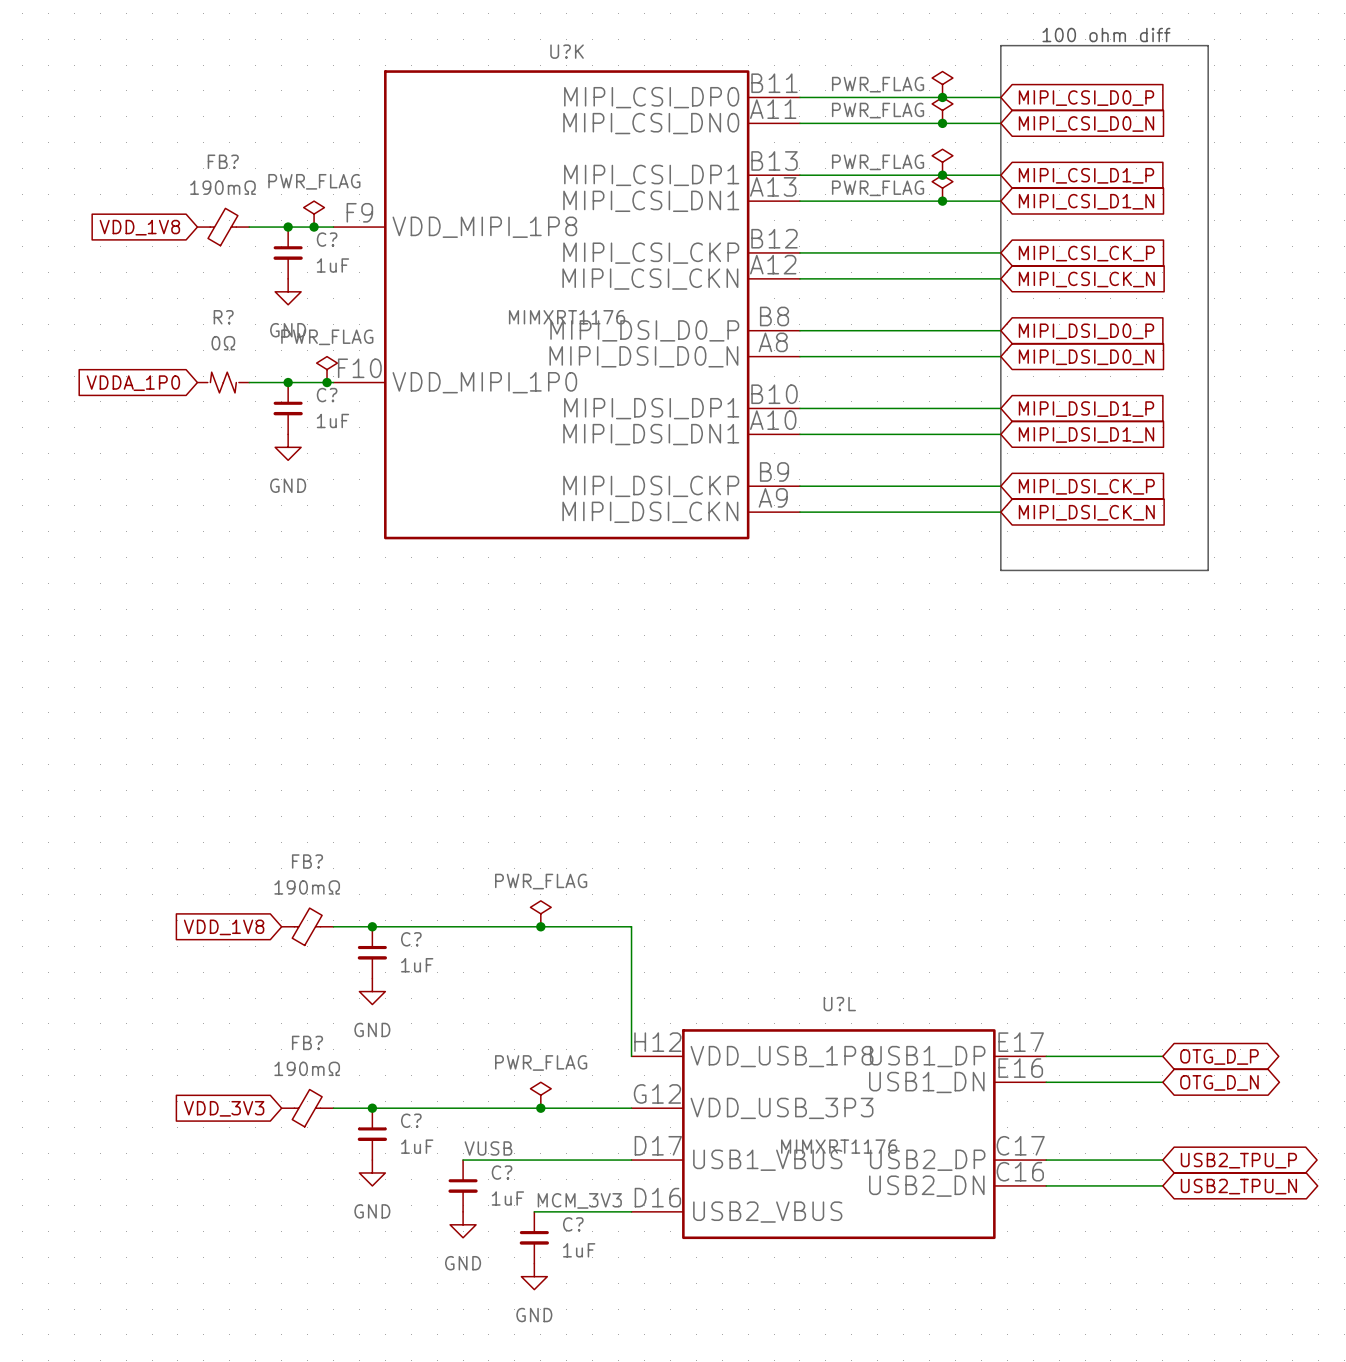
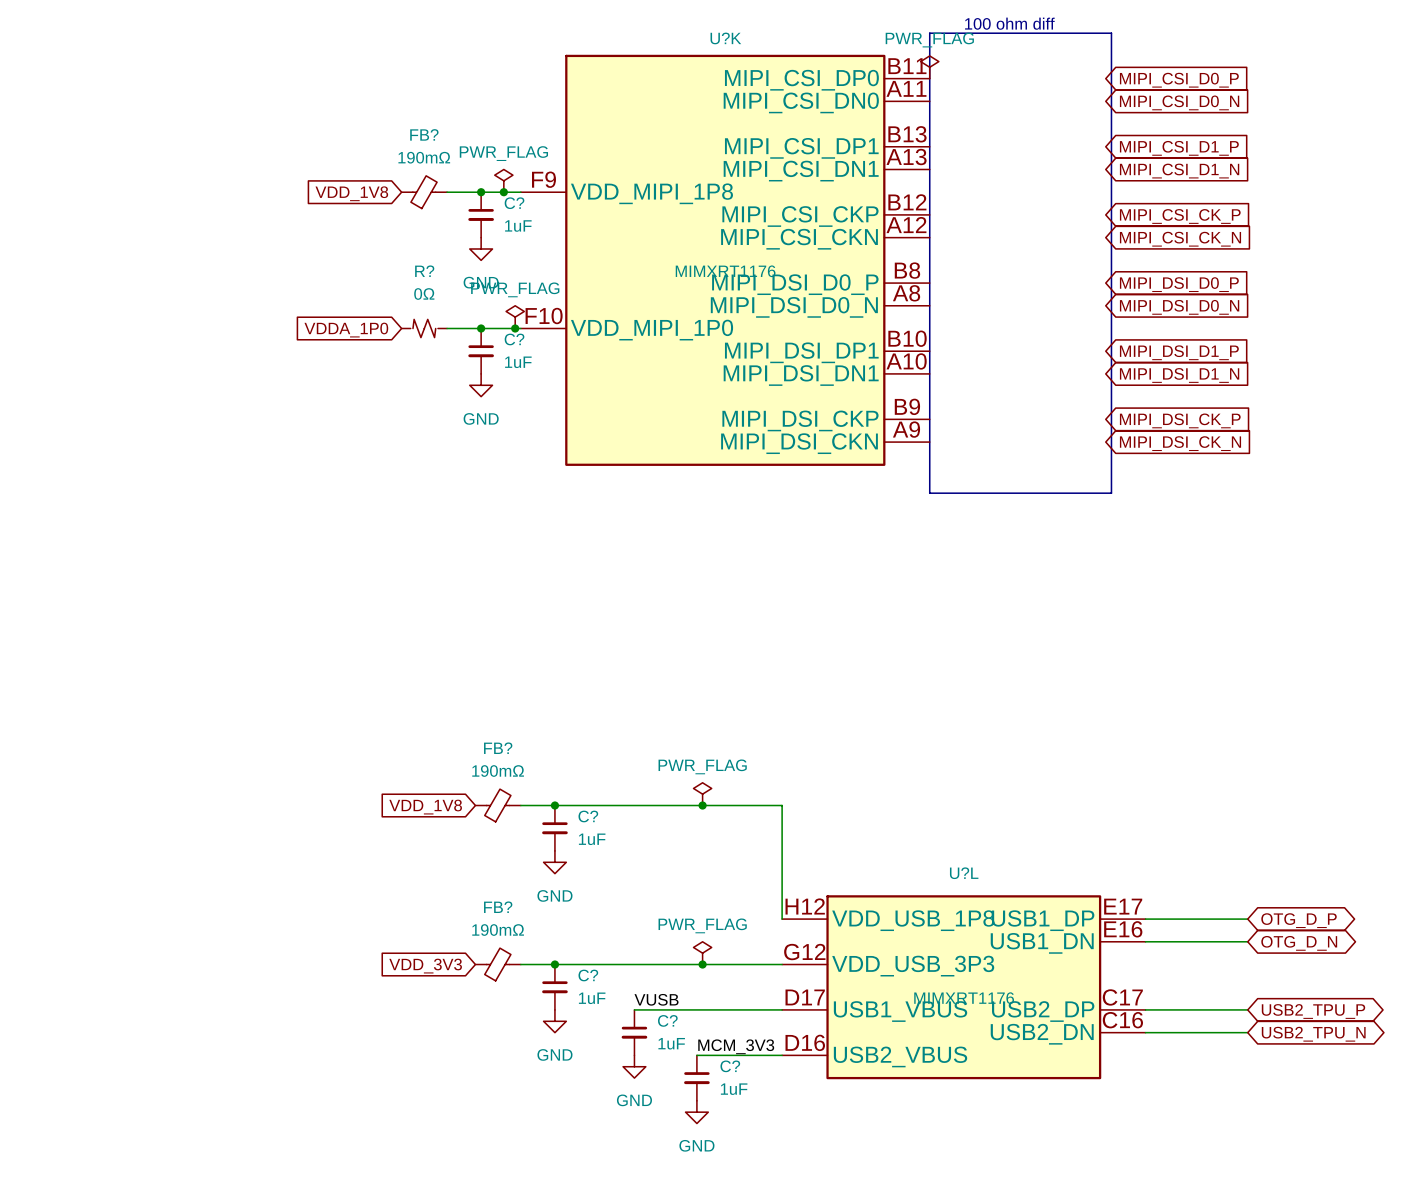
text position: 100 ohm diff (1106, 35) -> 100 ohm diff (1009, 23)
line: (1000, 45) (1000, 570) -> (1105, 33) (929, 33) (929, 493) (1105, 493)
line: (1007, 45) (1208, 45) (1208, 570) (1007, 570) -> (1111, 33) (1111, 493)
power symbol: none -> PWR_FLAG (929, 67)
power symbol: PWR_FLAG (942, 84) -> none
wire: (799, 97) (1000, 97) -> none
junction: (942, 97) -> none
power symbol: PWR_FLAG (942, 110) -> none
wire: (799, 123) (1000, 123) -> none
junction: (942, 123) -> none
power symbol: PWR_FLAG (942, 162) -> none
wire: (799, 175) (1000, 175) -> none
junction: (942, 175) -> none
power symbol: PWR_FLAG (942, 188) -> none
wire: (799, 201) (1000, 201) -> none
junction: (942, 201) -> none
wire: (799, 252) (1000, 252) -> none
wire: (799, 278) (1000, 278) -> none
wire: (799, 330) (1000, 330) -> none
wire: (799, 356) (1000, 356) -> none
wire: (799, 408) (1000, 408) -> none
wire: (799, 434) (1000, 434) -> none
wire: (799, 486) (1000, 486) -> none
wire: (799, 512) (1000, 512) -> none

